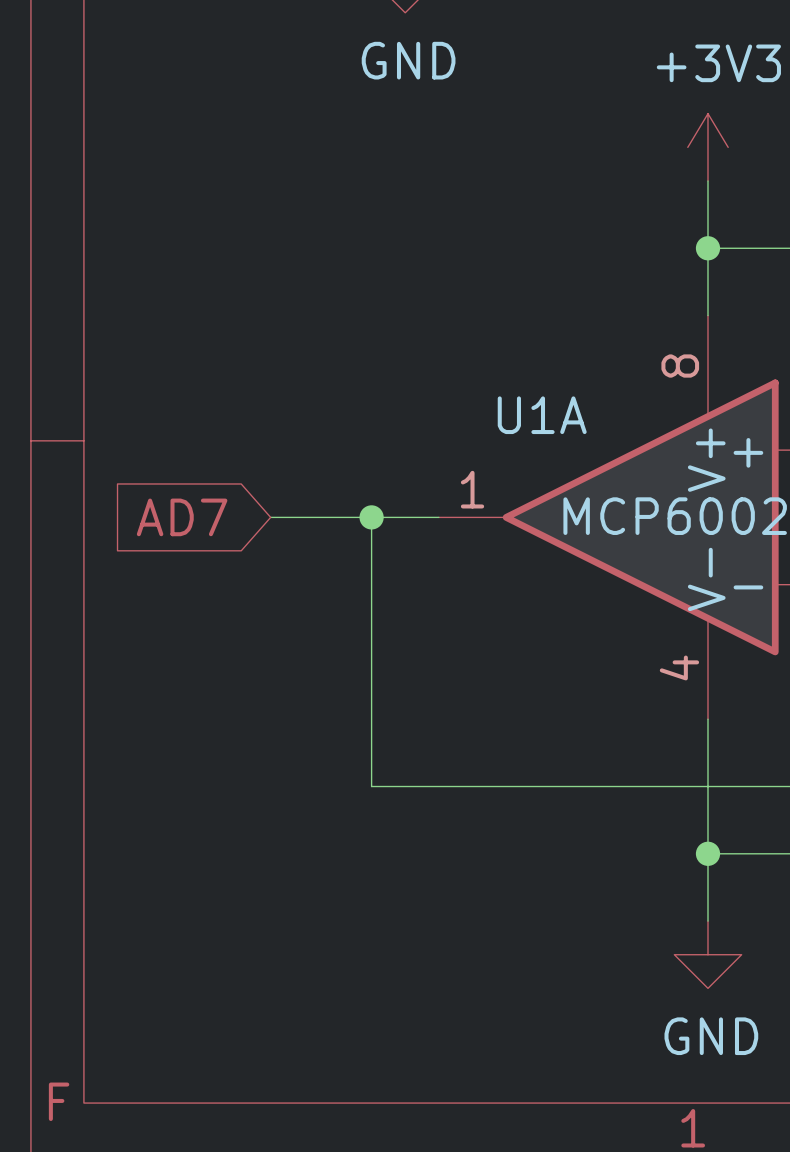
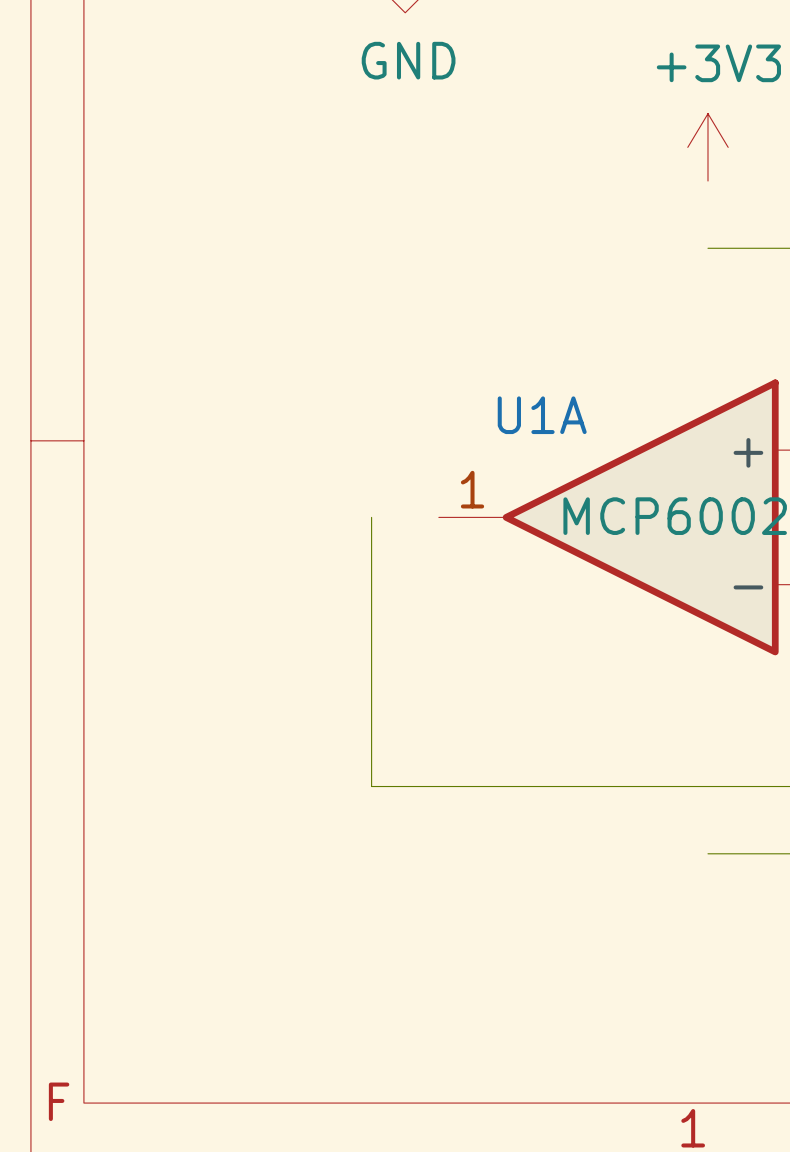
wire: (707, 180) (707, 315) -> none
junction: (707, 248) -> none
global label: AD7 (182, 517) -> none
wire: (270, 517) (438, 517) -> none
junction: (371, 517) -> none
part: (707, 517) -> none
wire: (707, 719) (707, 921) -> none
junction: (707, 853) -> none
power symbol: GND (707, 954) -> none

